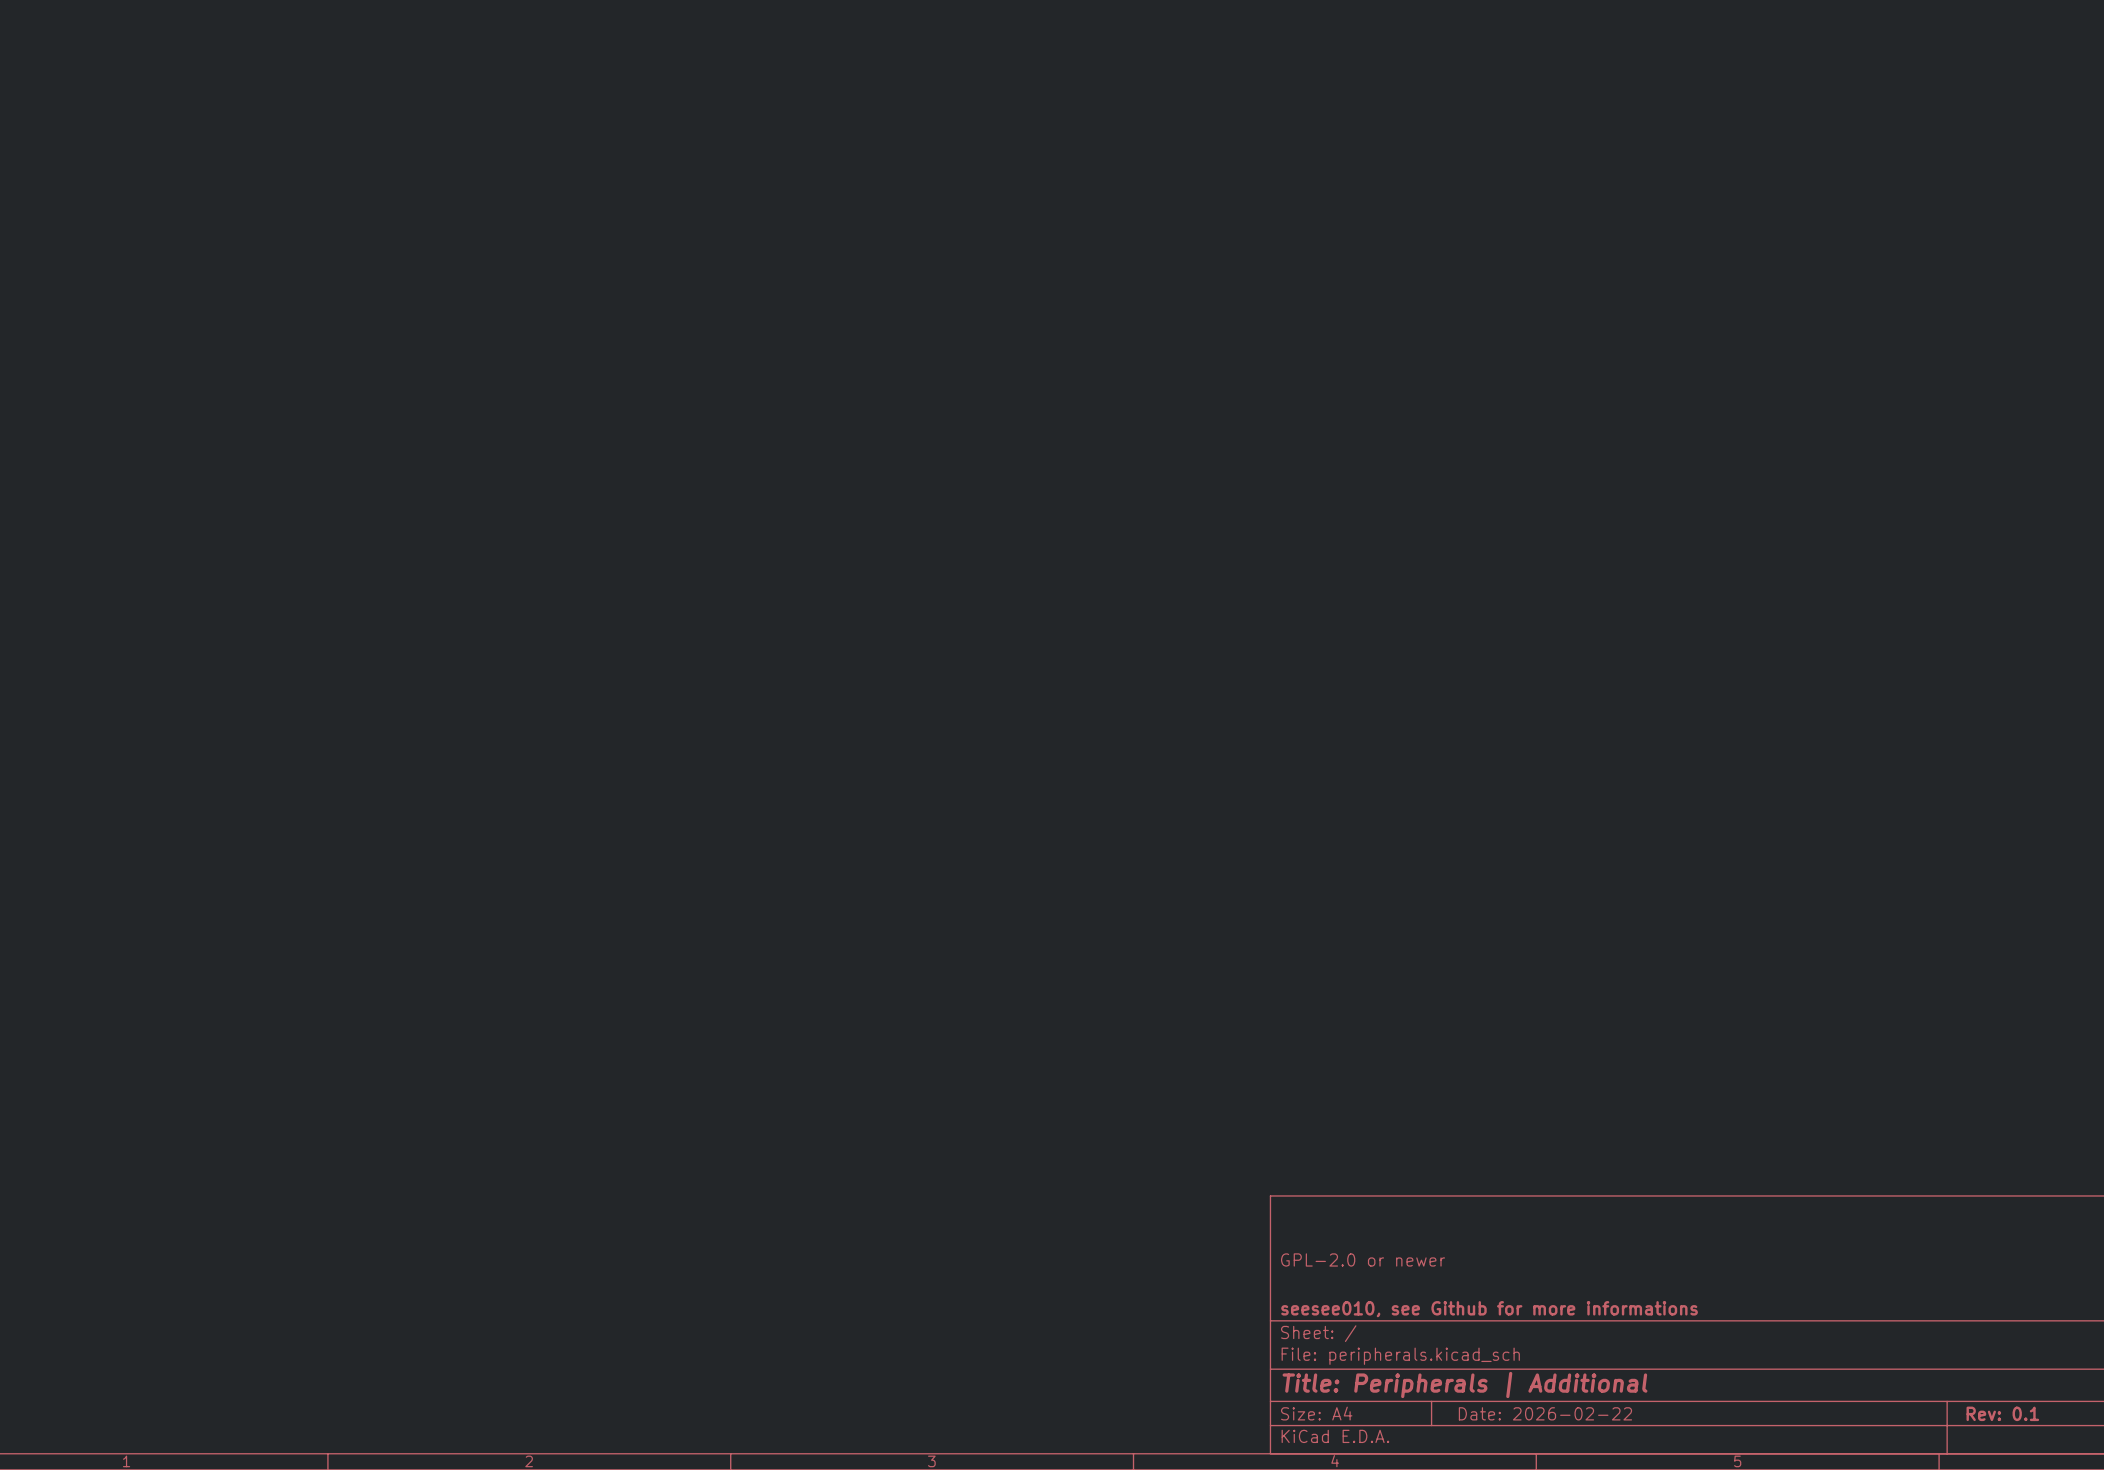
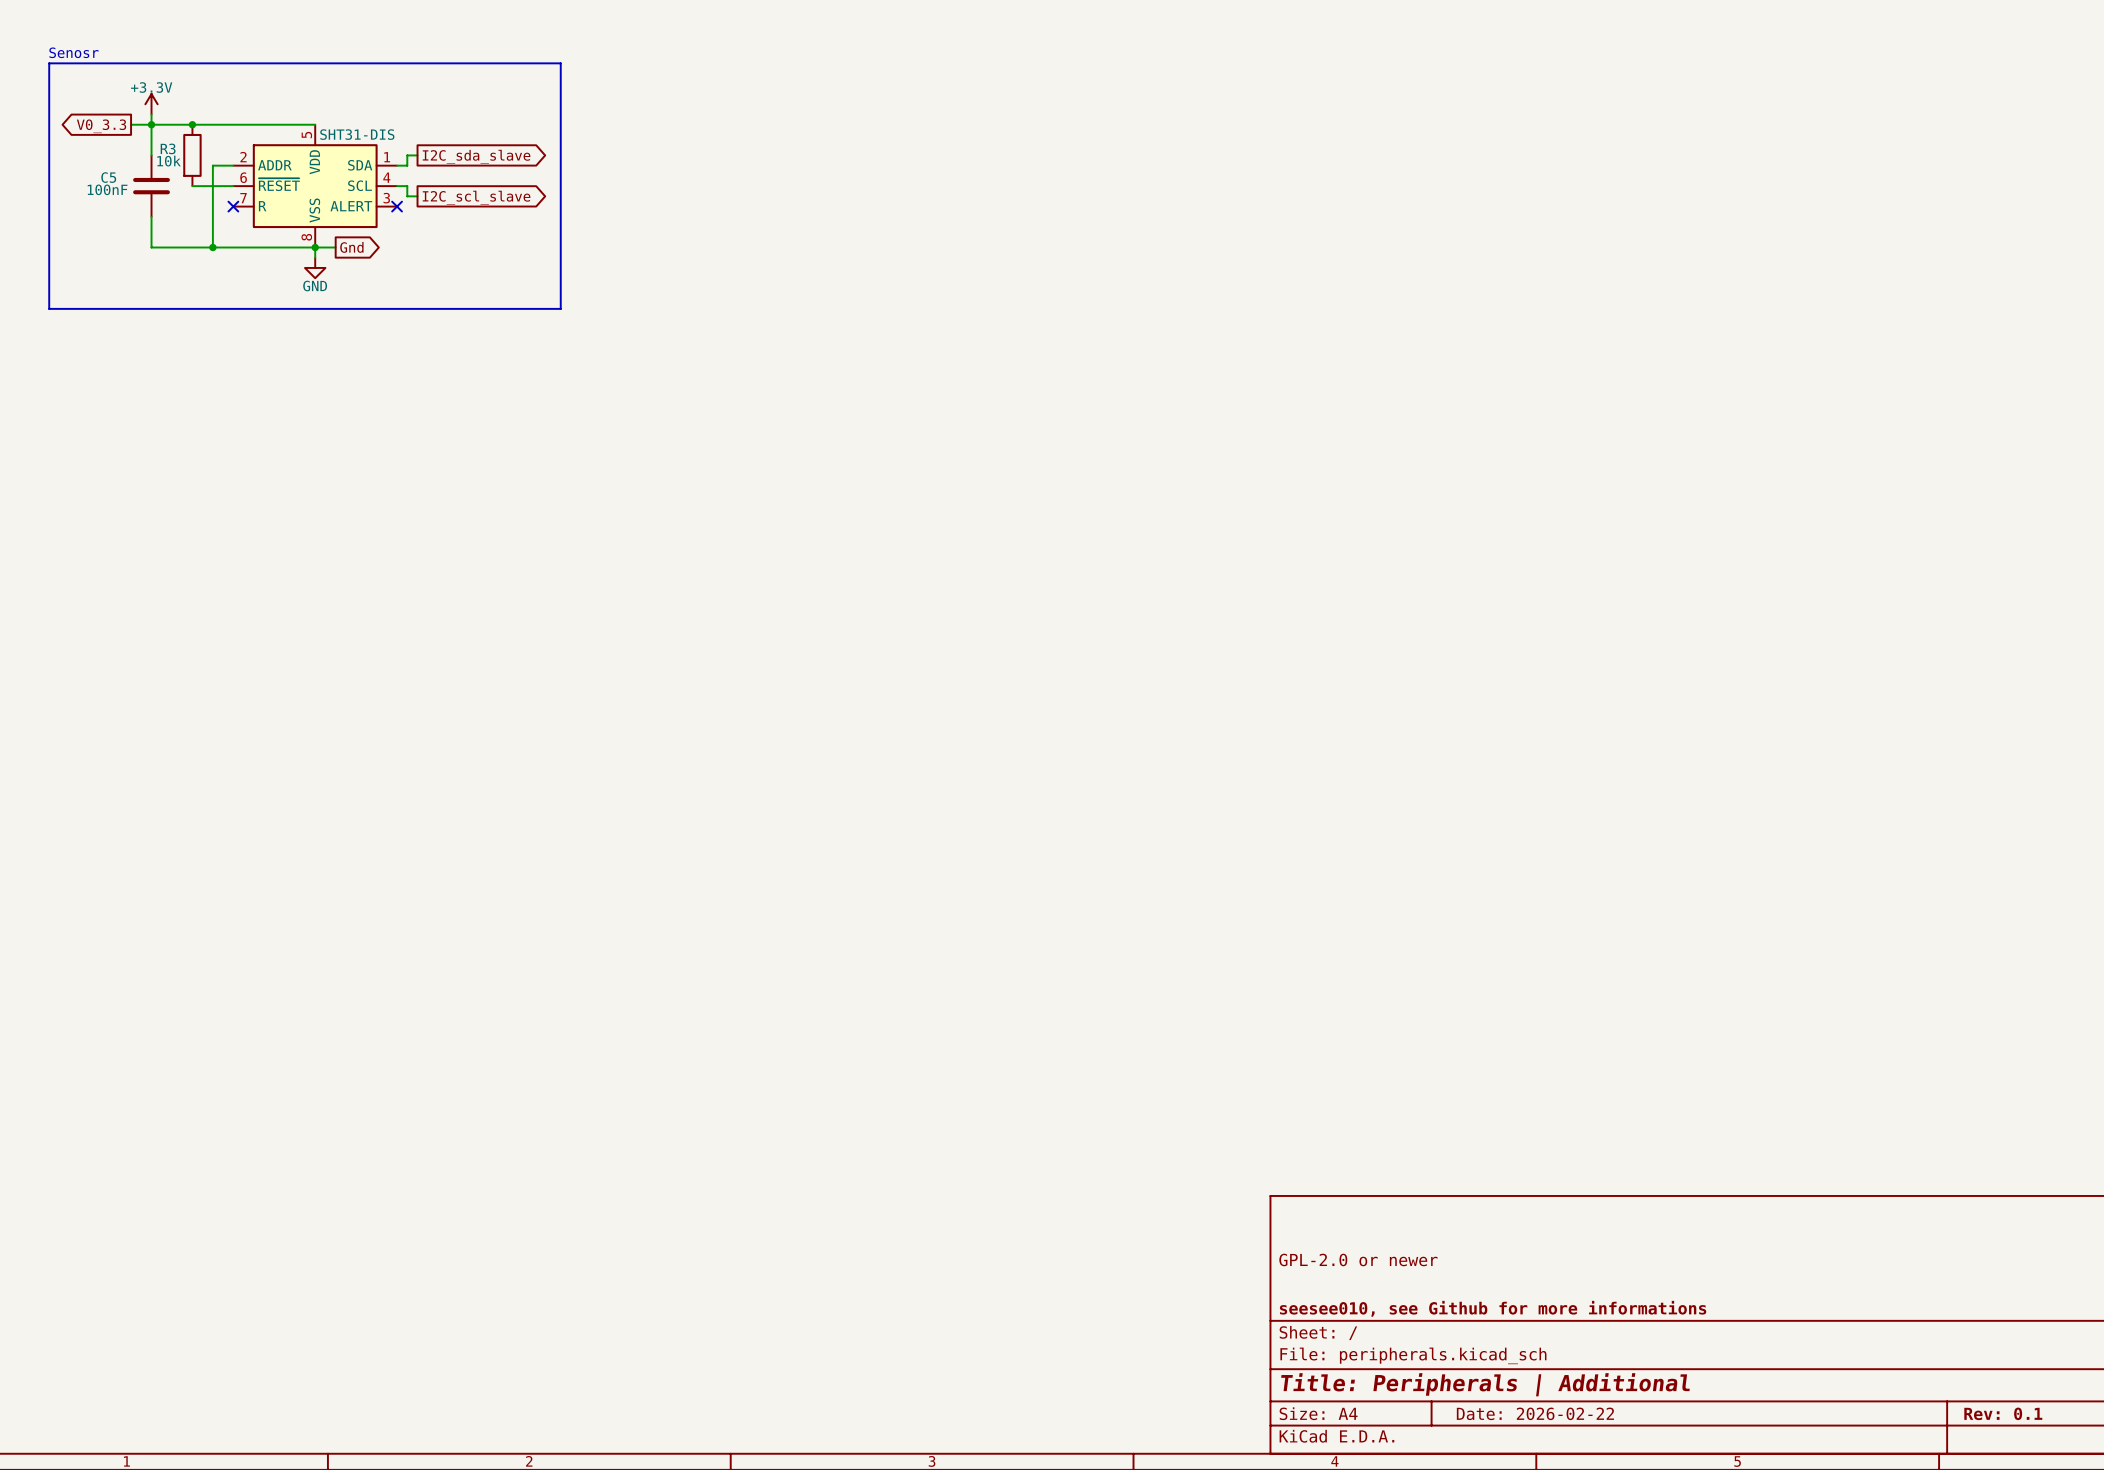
text: none -> Senosr (73, 52)
line: none -> (49, 63) (560, 63) (560, 308) (49, 308) (49, 63)
power symbol: none -> +3.3V (151, 104)
wire: none -> (151, 114) (151, 155)
wire: none -> (131, 124) (315, 124)
junction: none -> (151, 124)
junction: none -> (192, 124)
global label: none -> V0_3.3 (101, 126)
R3: none -> 10k (192, 155)
wire: none -> (417, 155) (407, 155) (407, 165) (397, 165)
global label: none -> I2C_sda_slave (476, 156)
wire: none -> (233, 165) (212, 165) (212, 247)
C5: none -> 100nF (151, 186)
wire: none -> (192, 186) (233, 186)
part: none -> SHT31-DIS (315, 186)
wire: none -> (397, 186) (407, 186) (407, 196) (417, 196)
global label: none -> I2C_scl_slave (476, 197)
no-connect mark: none -> (233, 206)
no-connect mark: none -> (397, 206)
wire: none -> (151, 216) (151, 247) (335, 247)
junction: none -> (212, 247)
wire: none -> (315, 247) (315, 257)
junction: none -> (315, 247)
global label: none -> Gnd (351, 247)
power symbol: none -> GND (315, 267)

